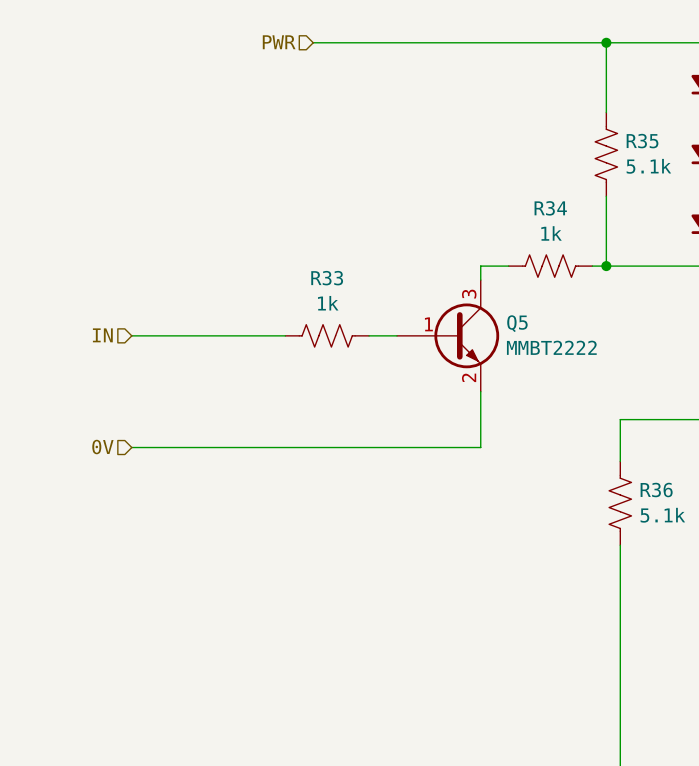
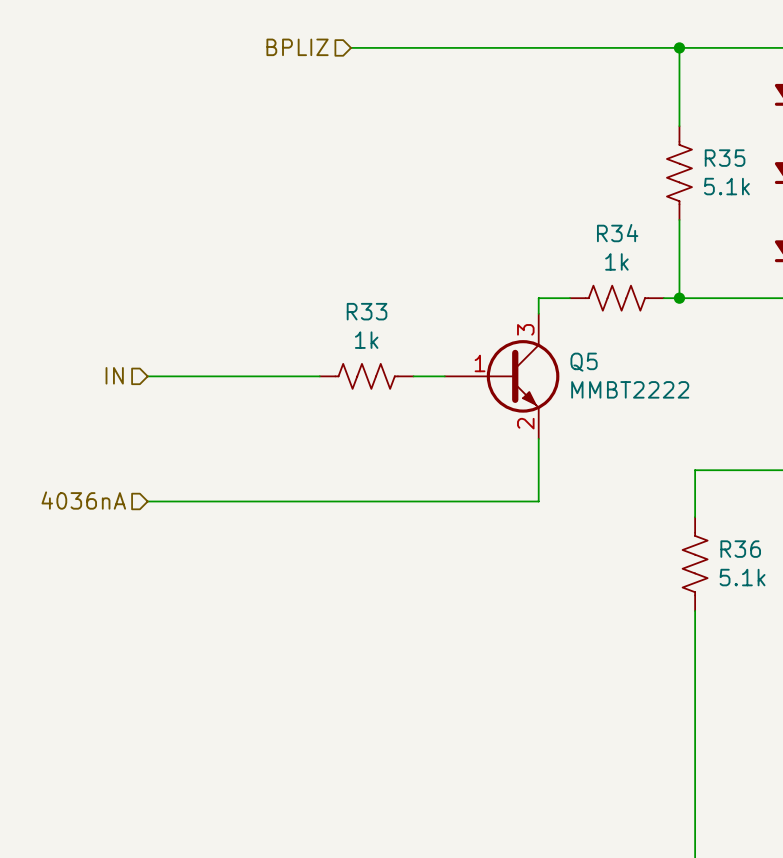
hierarchical label: PWR (279, 42) -> BPLIZ (297, 47)
hierarchical label: 0V (102, 447) -> 4036nA (83, 500)

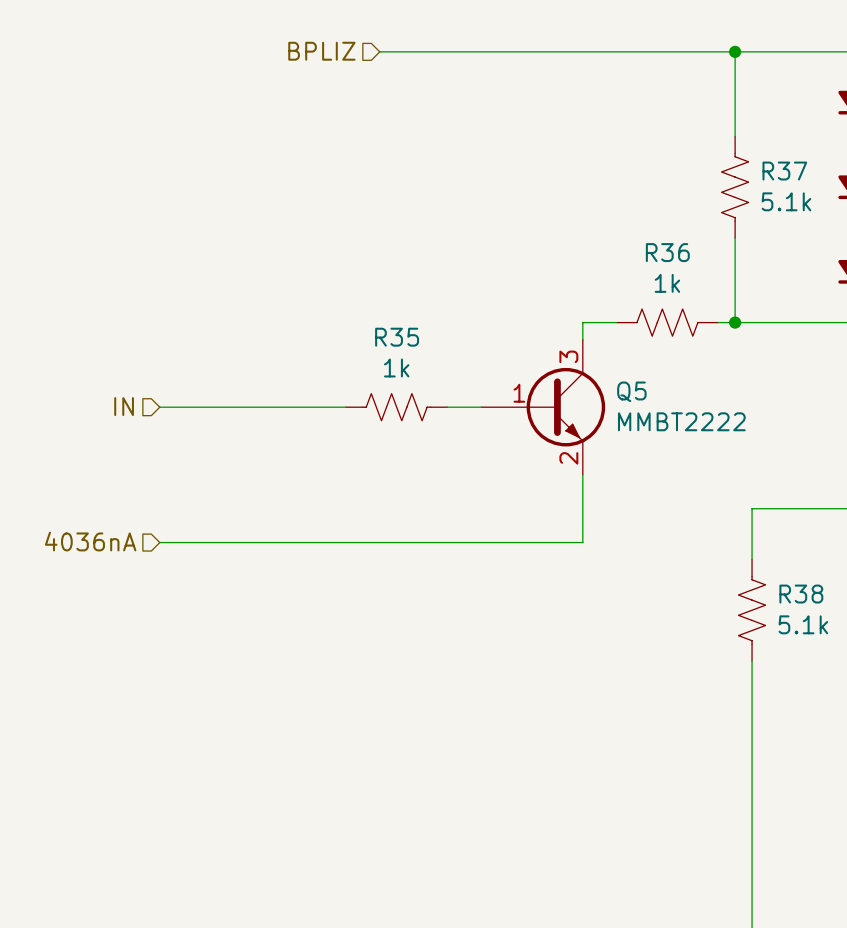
R35 name: R35 (725, 158) -> R37 (784, 171)
R34 name: R34 (617, 233) -> R36 (667, 252)
R33 name: R33 (367, 311) -> R35 (397, 337)
R36 name: R36 (740, 549) -> R38 (801, 594)

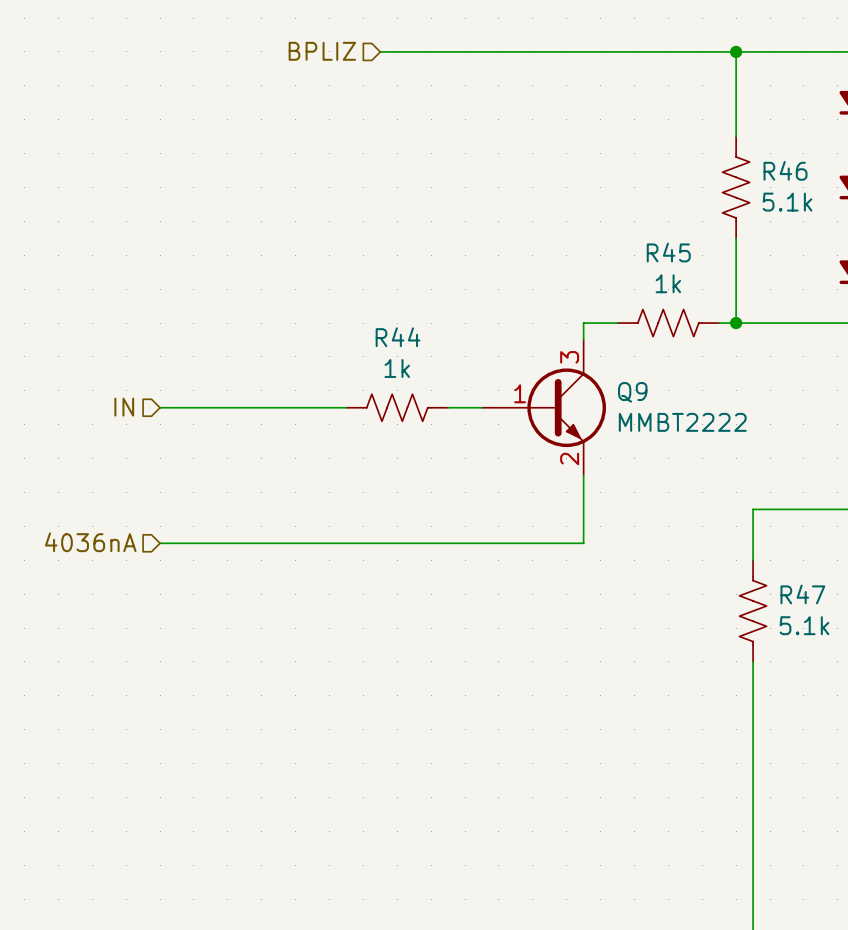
R37 name: R37 (784, 171) -> R46 (785, 170)
R36 name: R36 (667, 252) -> R45 (668, 252)
R35 name: R35 (397, 337) -> R44 (398, 337)
Q5 name: Q5 (631, 391) -> Q9 (632, 392)
R38 name: R38 (801, 594) -> R47 (802, 594)

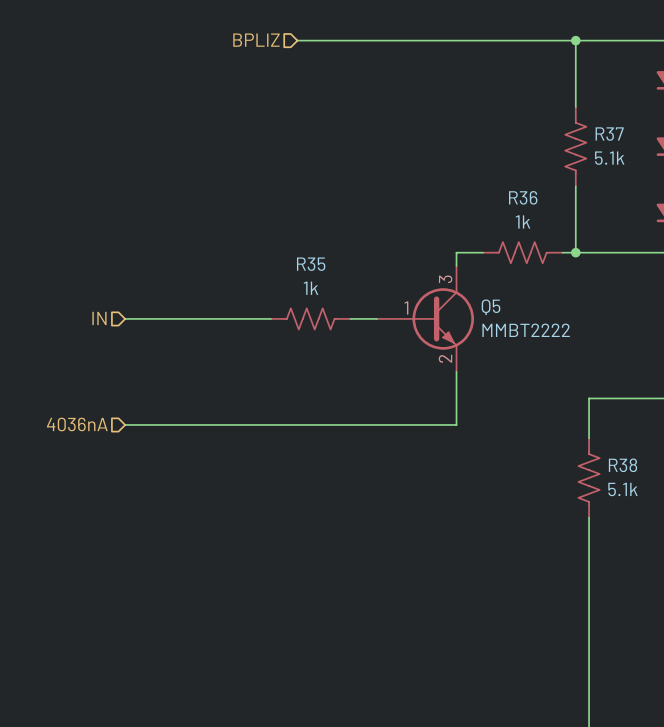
R46 name: R46 (785, 170) -> R37 (609, 134)
R45 name: R45 (668, 252) -> R36 (523, 197)
R44 name: R44 (398, 337) -> R35 (311, 264)
Q9 name: Q9 (632, 392) -> Q5 (491, 307)
R47 name: R47 (802, 594) -> R38 (622, 465)

